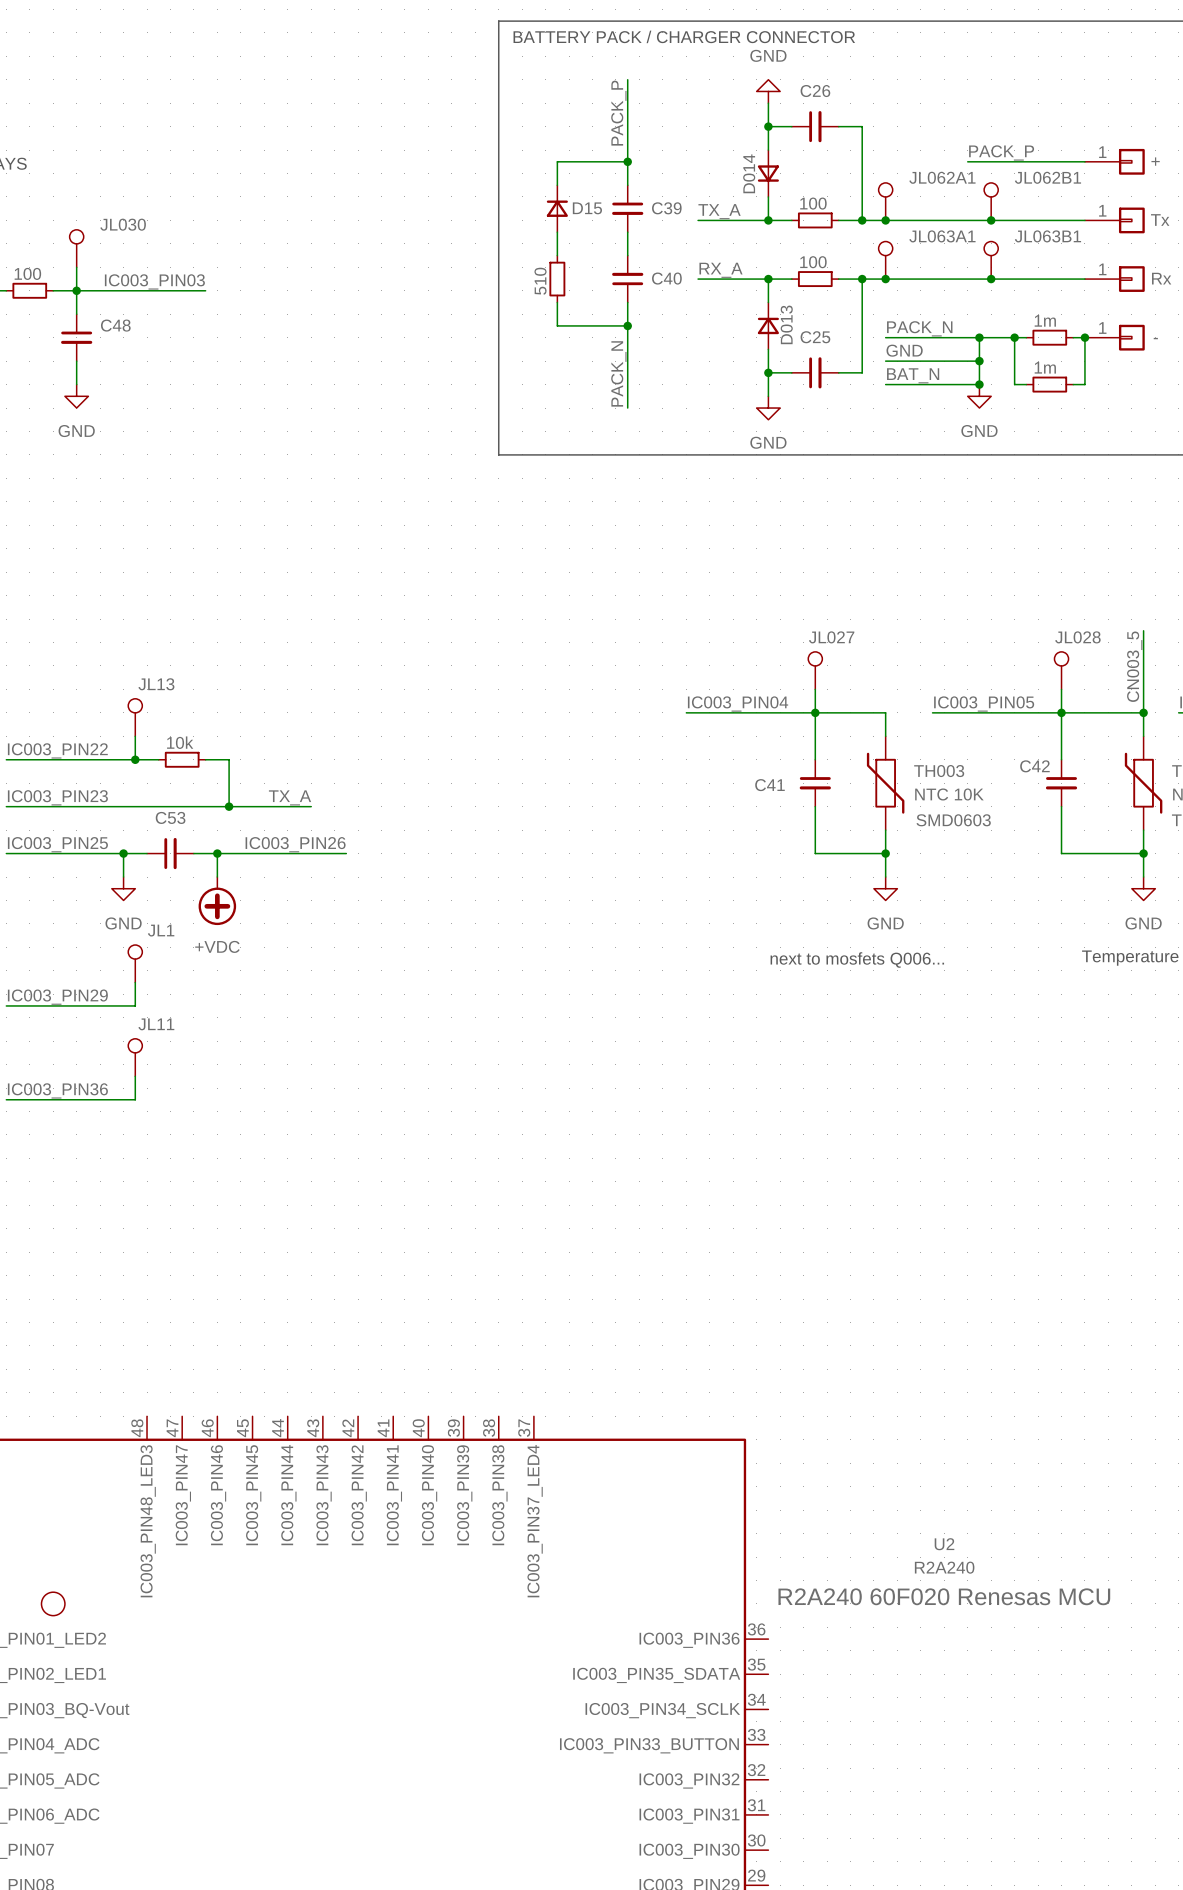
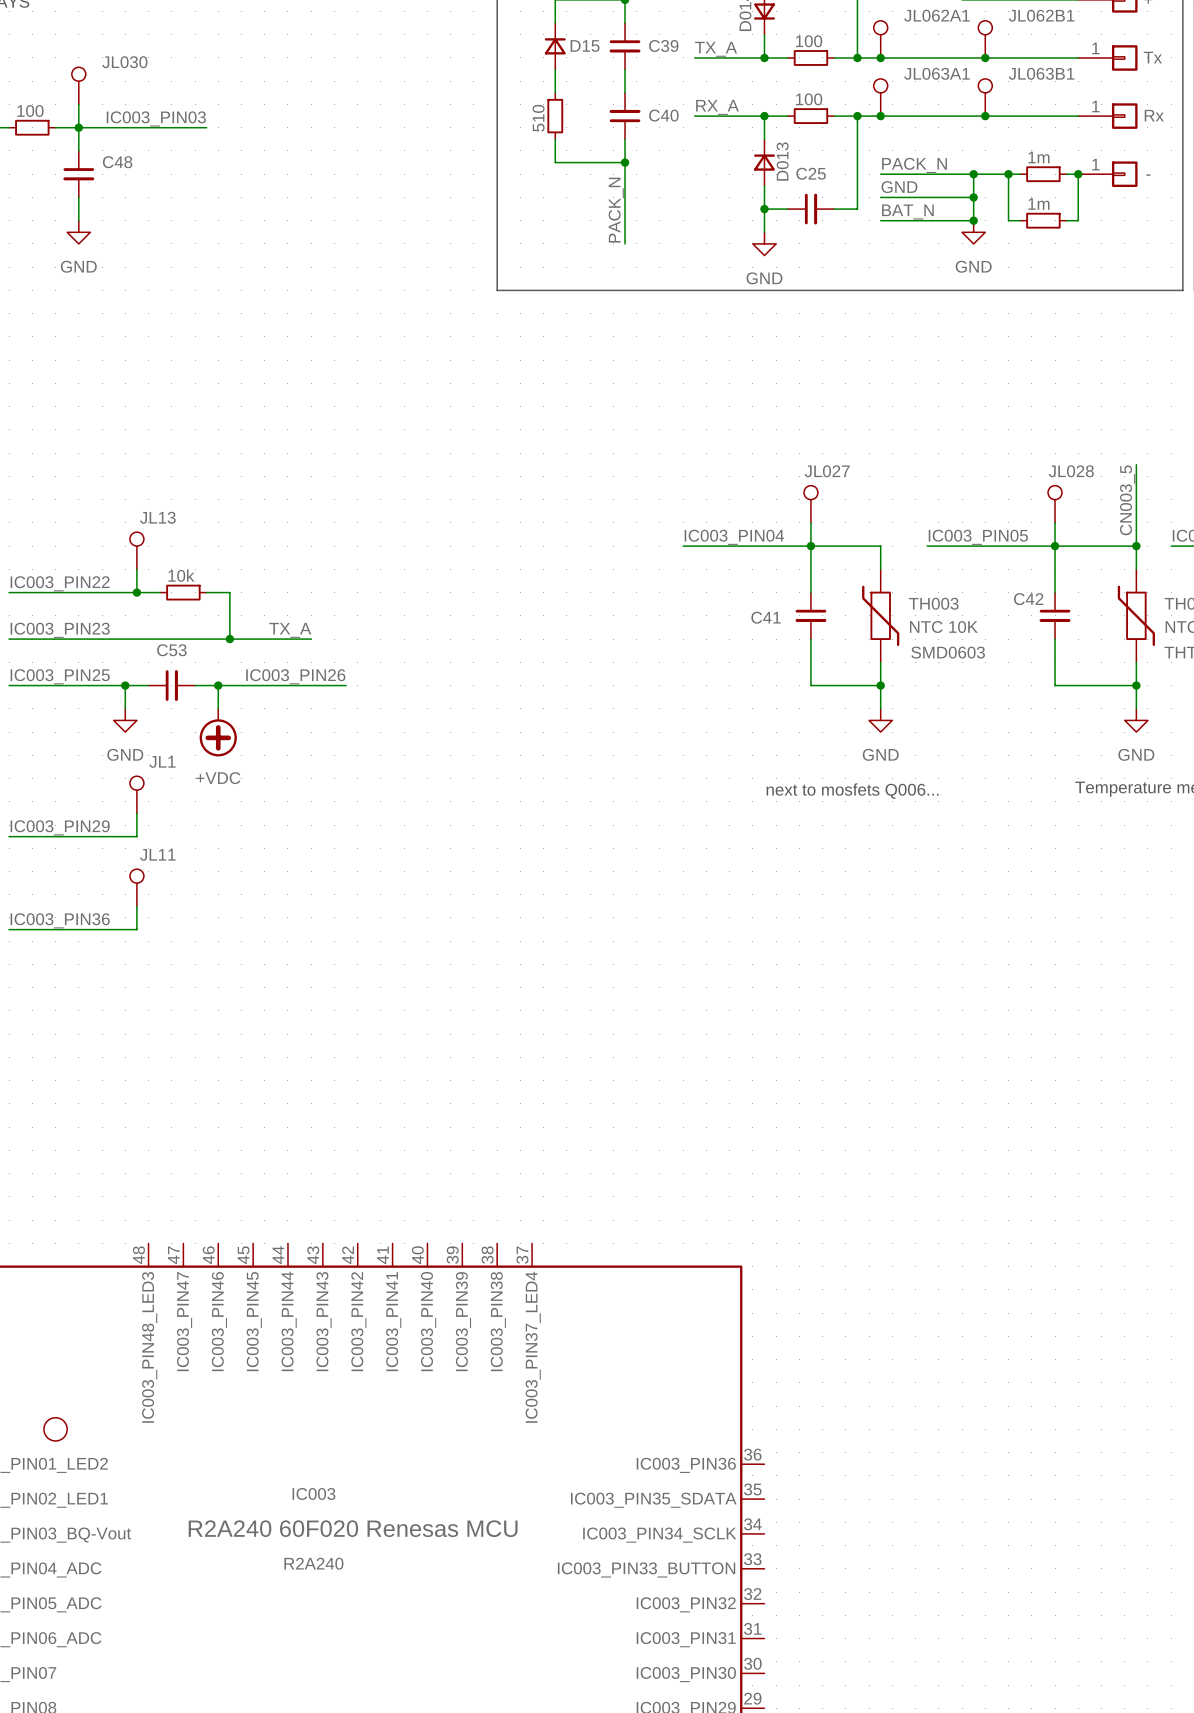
U2 name: U2 (944, 1544) -> IC003 (313, 1493)
U2 value position: R2A240 (944, 1567) -> R2A240 (313, 1563)
U2 text position: R2A240 60F020 Renesas MCU (944, 1596) -> R2A240 60F020 Renesas MCU (353, 1528)

